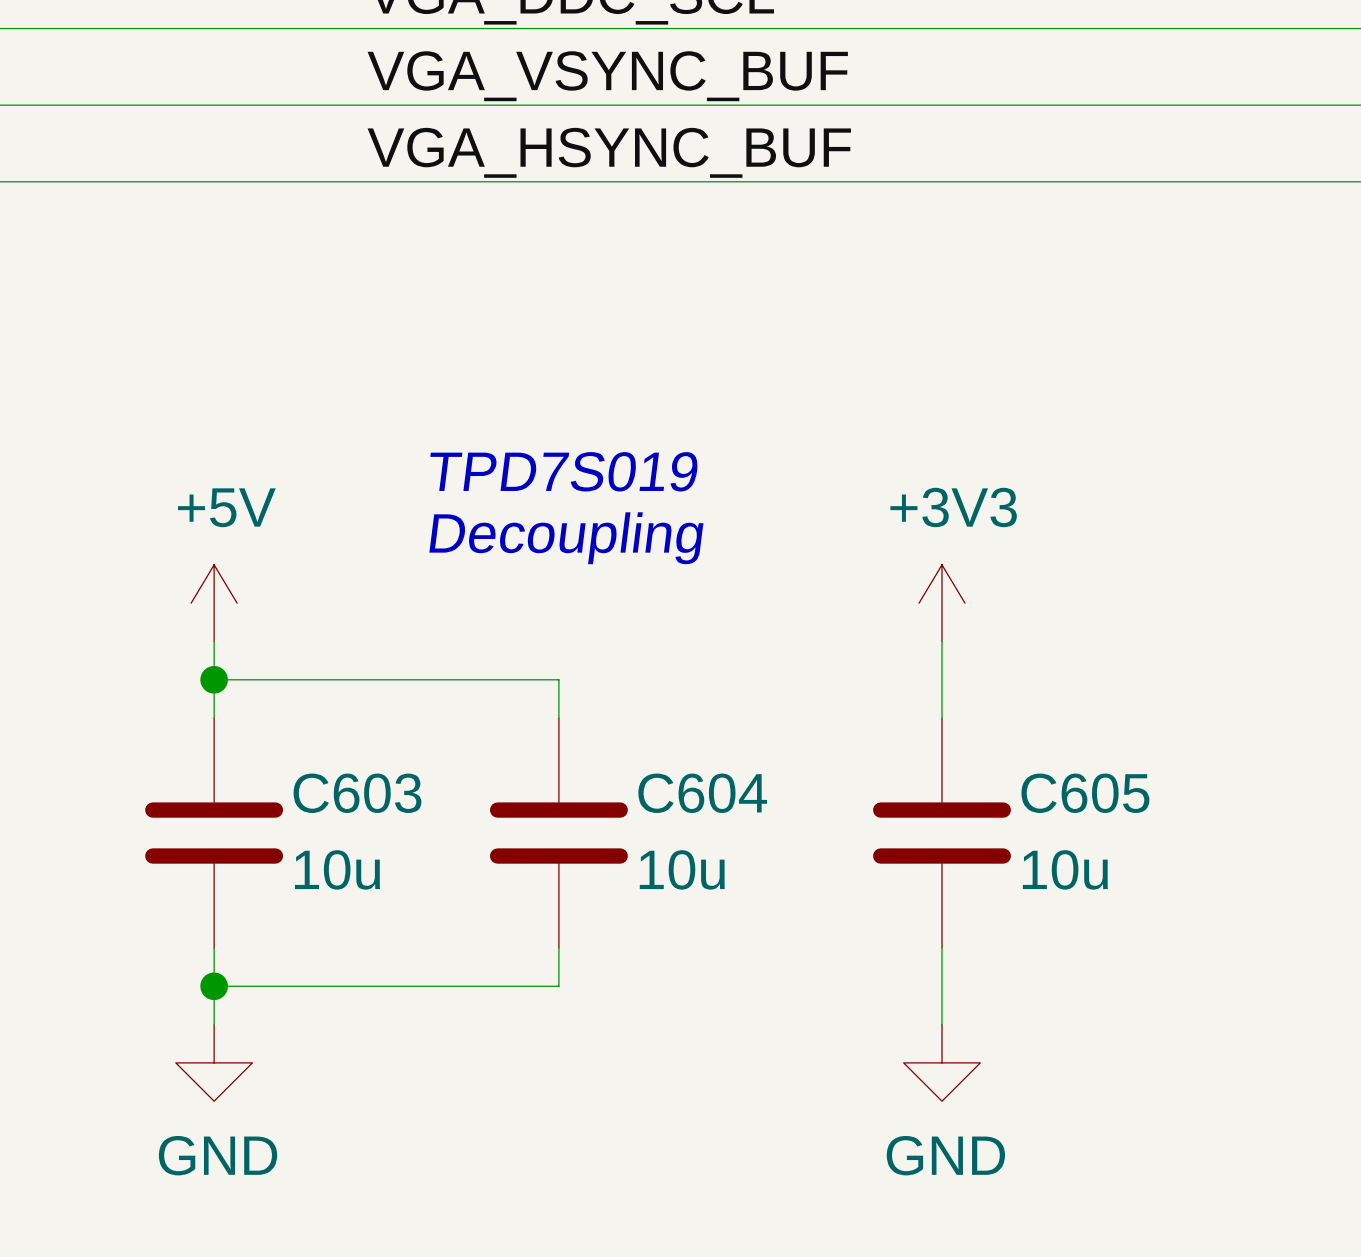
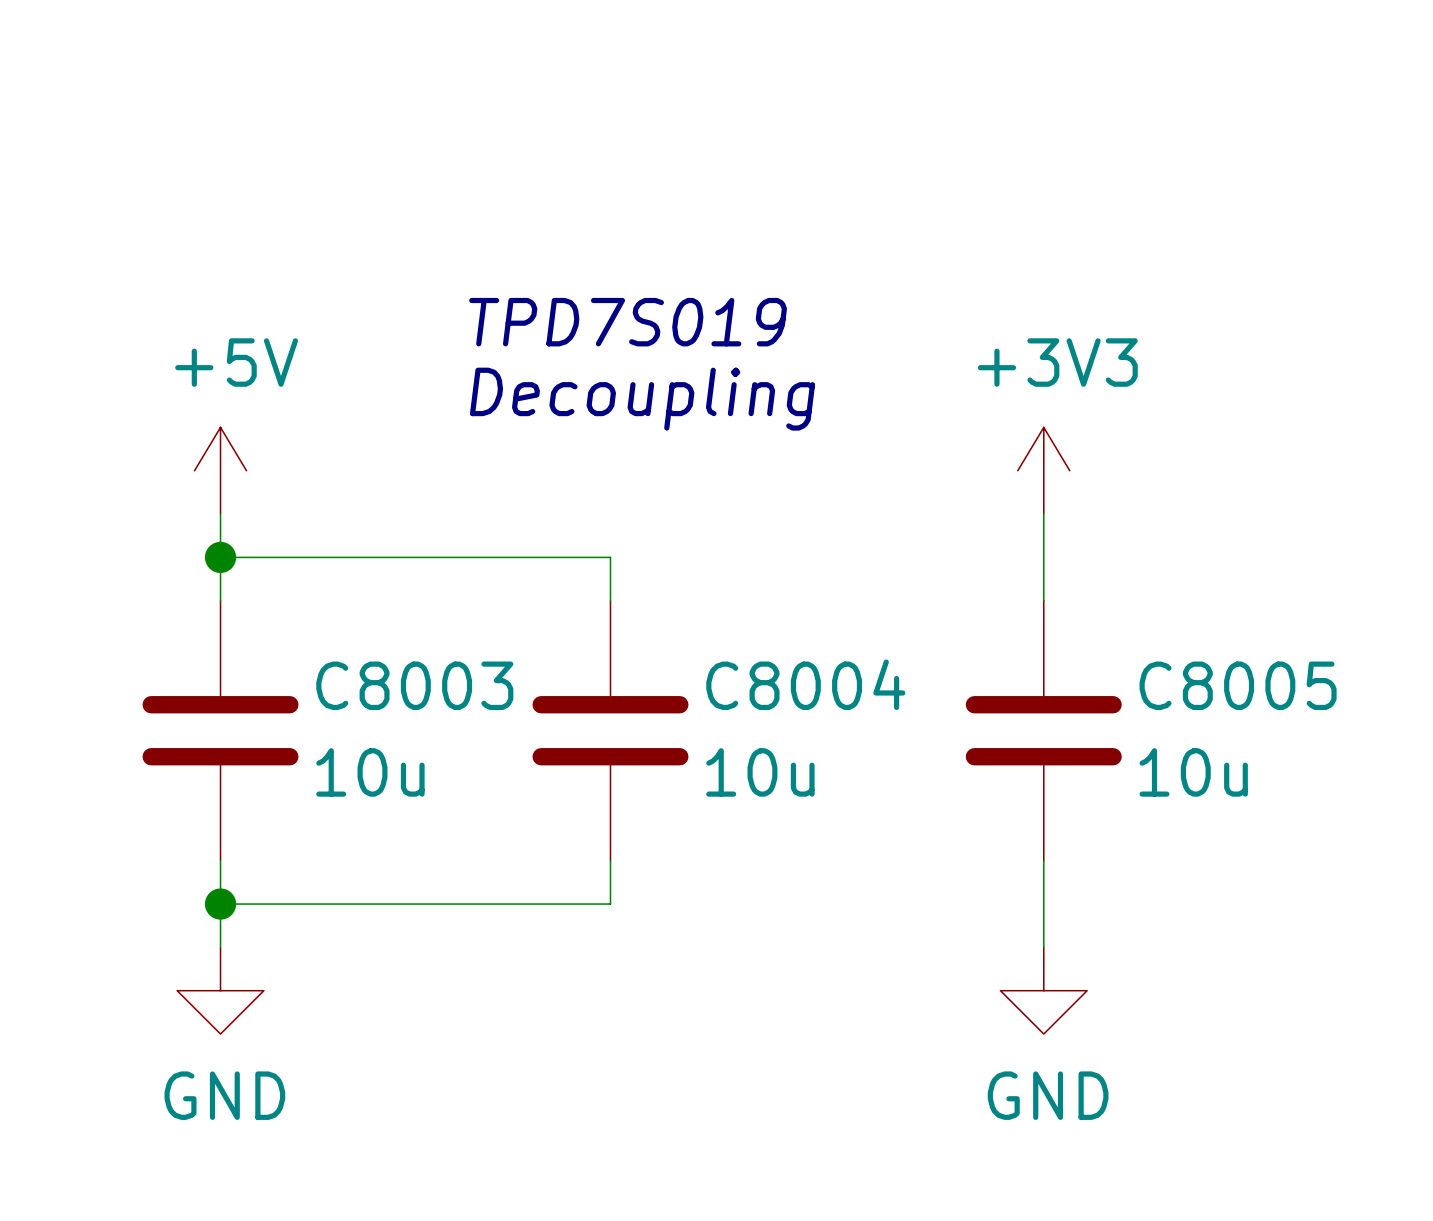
C603 name: C603 (357, 793) -> C8003 (414, 685)
C604 name: C604 (702, 793) -> C8004 (805, 684)
C605 name: C605 (1085, 793) -> C8005 (1238, 685)

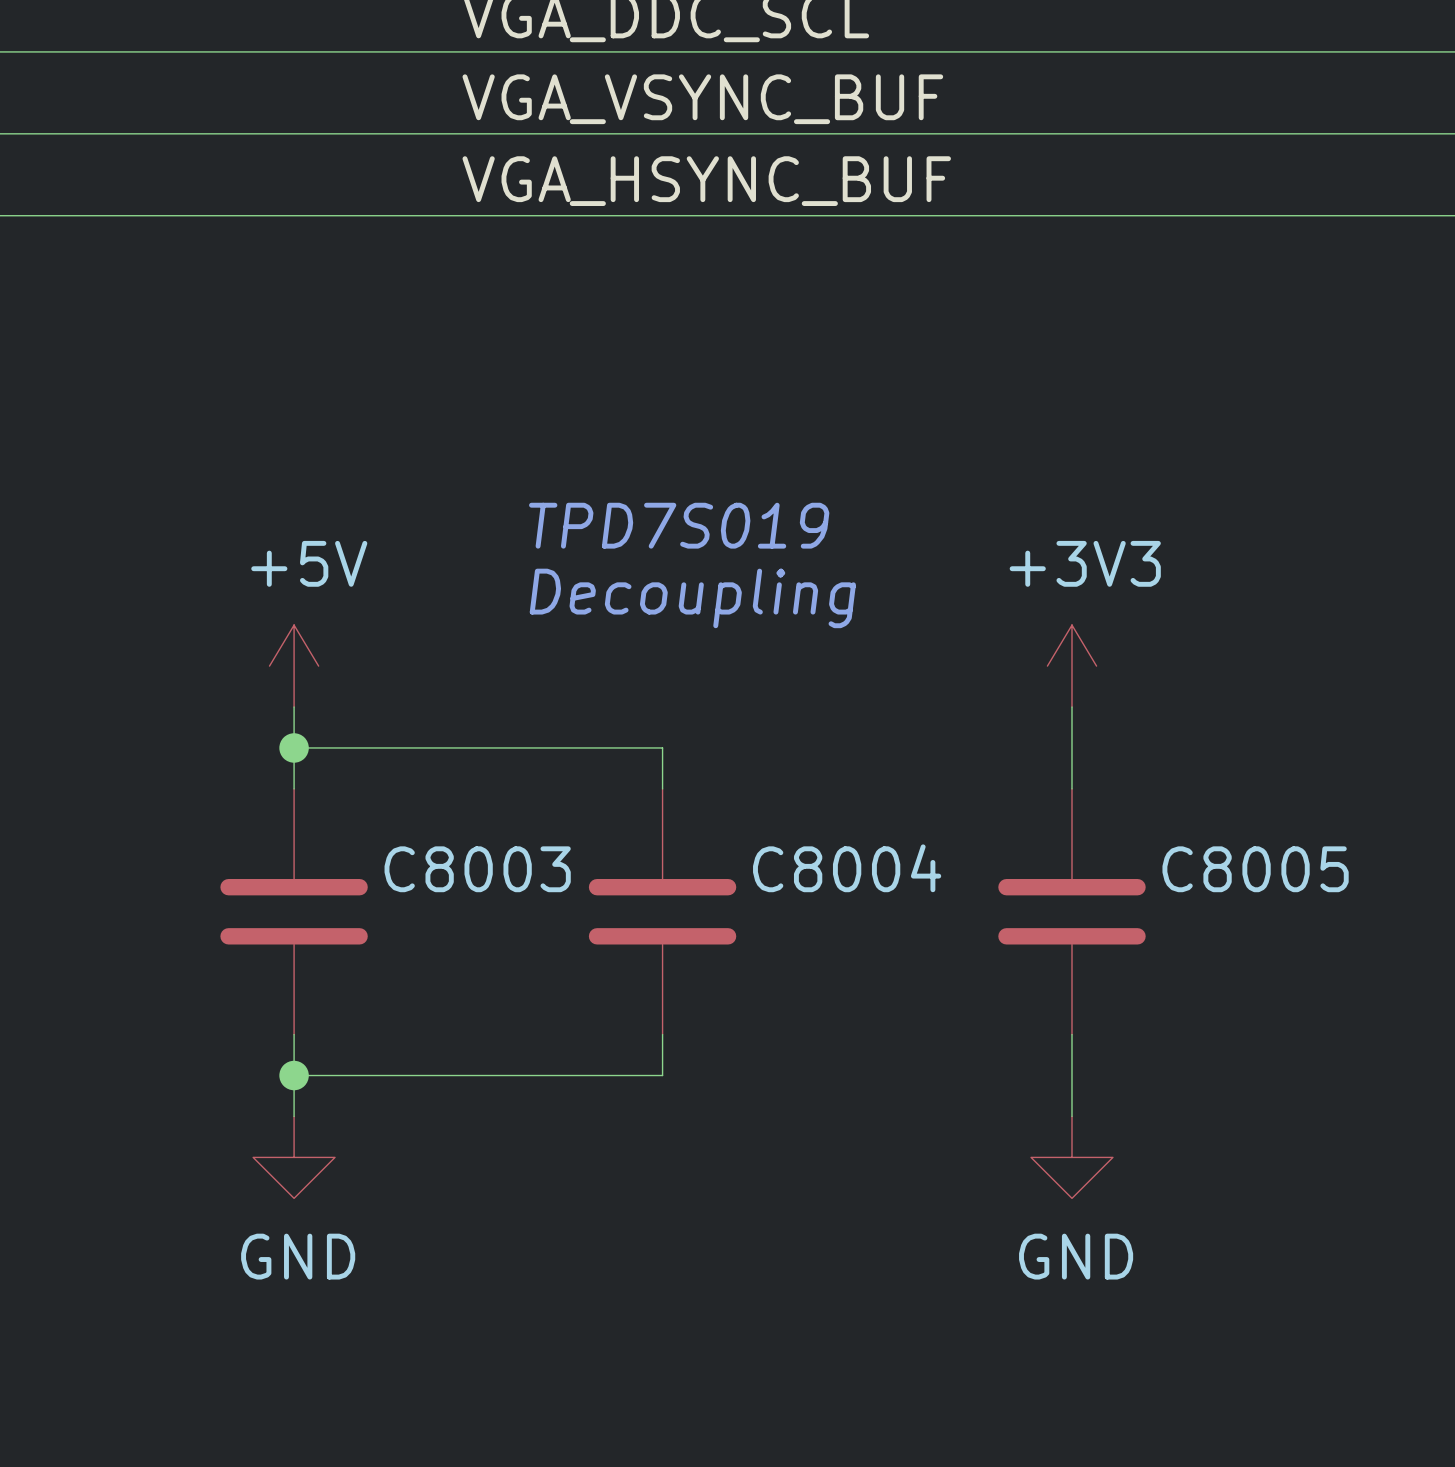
C8003 value: 10u (370, 772) -> none
C8004 value: 10u (760, 772) -> none
C8005 value: 10u (1193, 772) -> none

